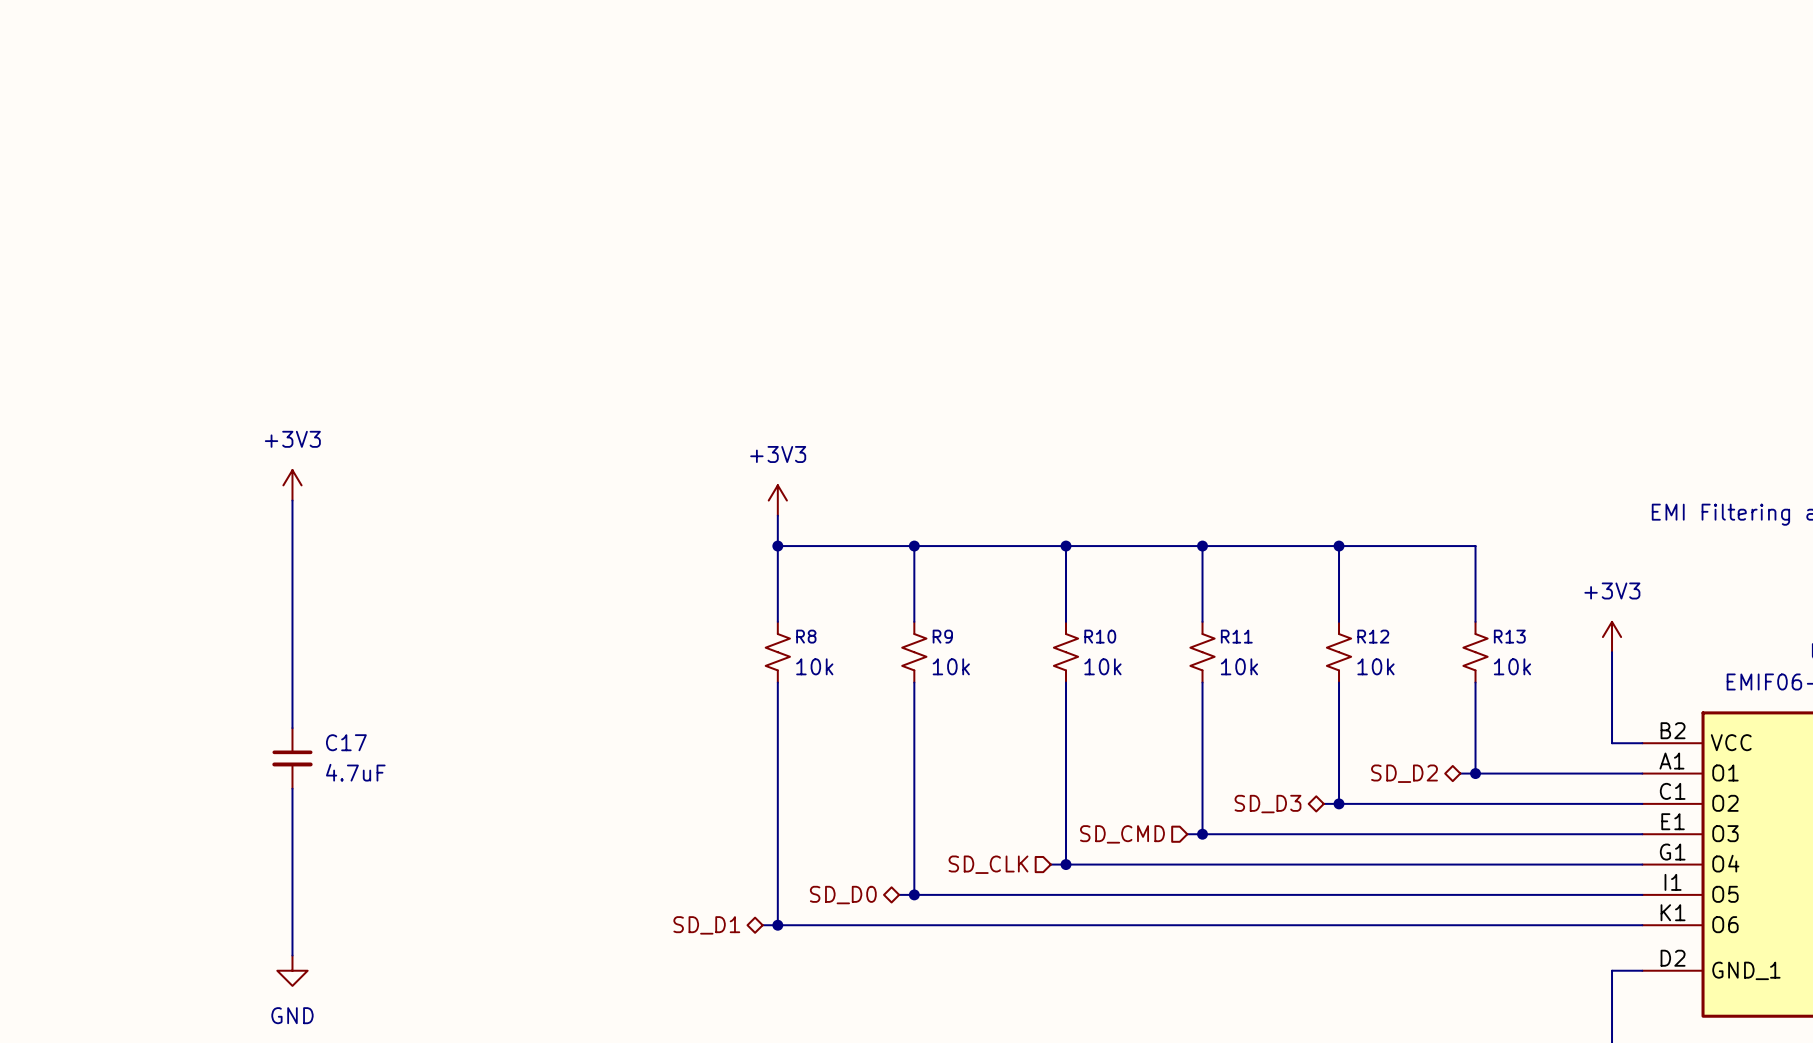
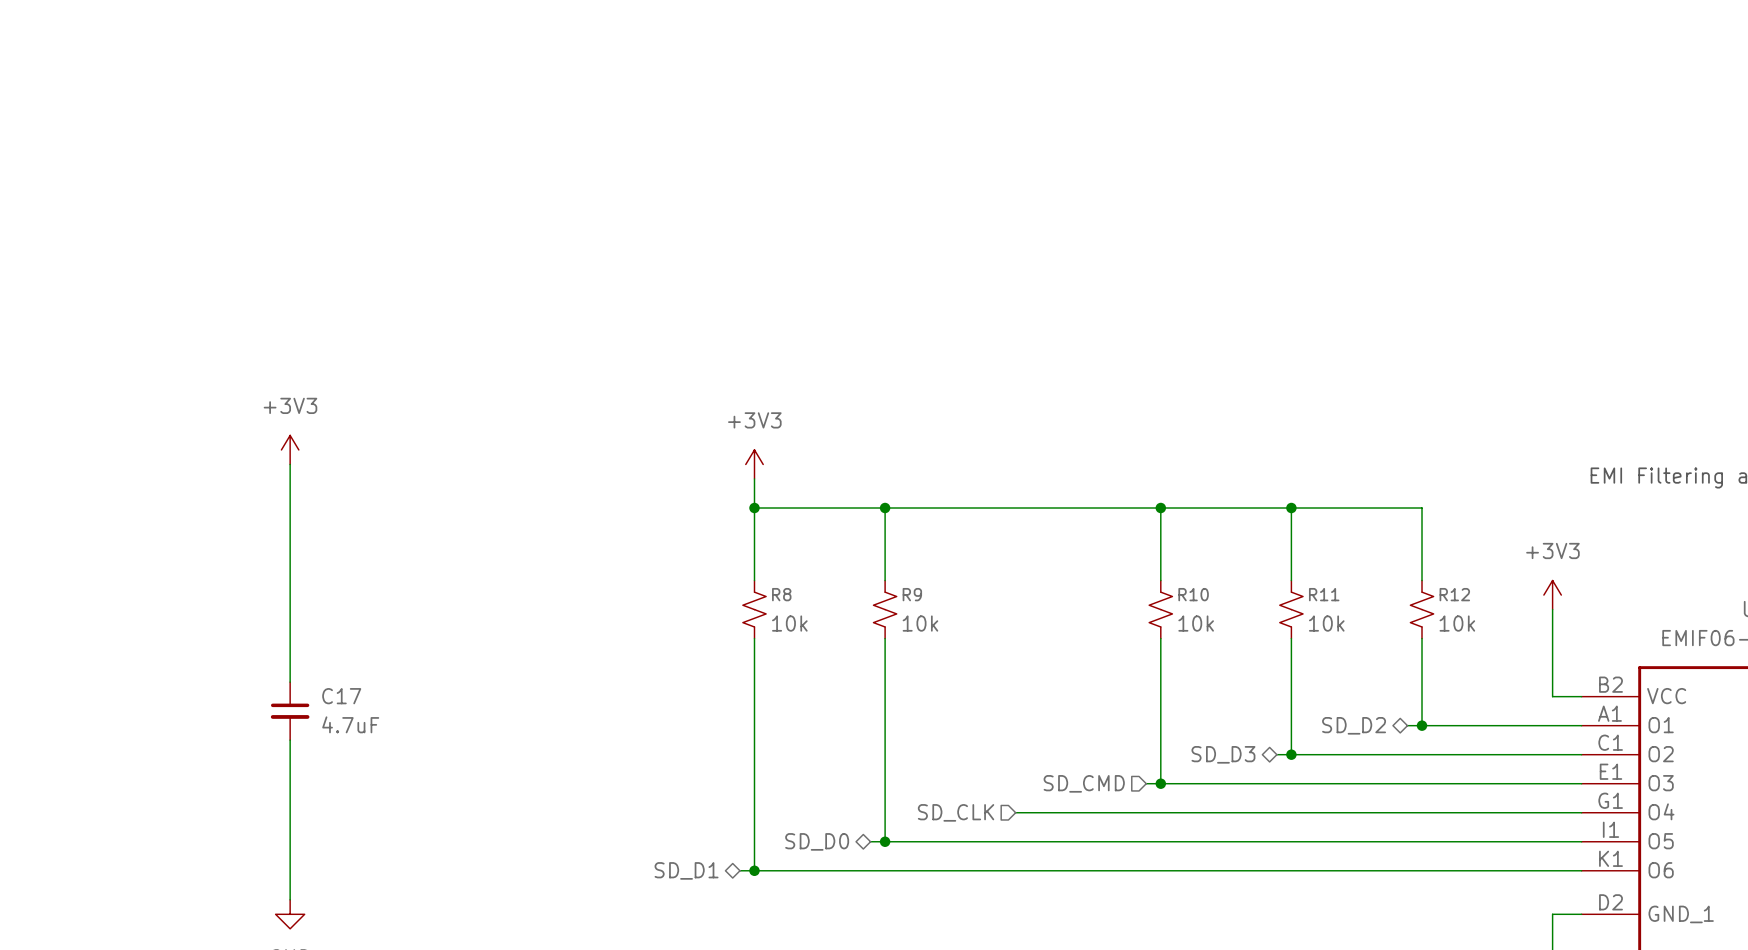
wire: (1066, 546) (1066, 621) -> none
junction: (1066, 546) -> none
R11 name: R11 (1236, 636) -> R10 (1193, 594)
R12 name: R12 (1373, 636) -> R11 (1324, 594)
R13 name: R13 (1509, 636) -> R12 (1454, 594)
R10: 10k (1066, 652) -> none
wire: (1066, 682) (1066, 864) -> none
junction: (1066, 864) -> none

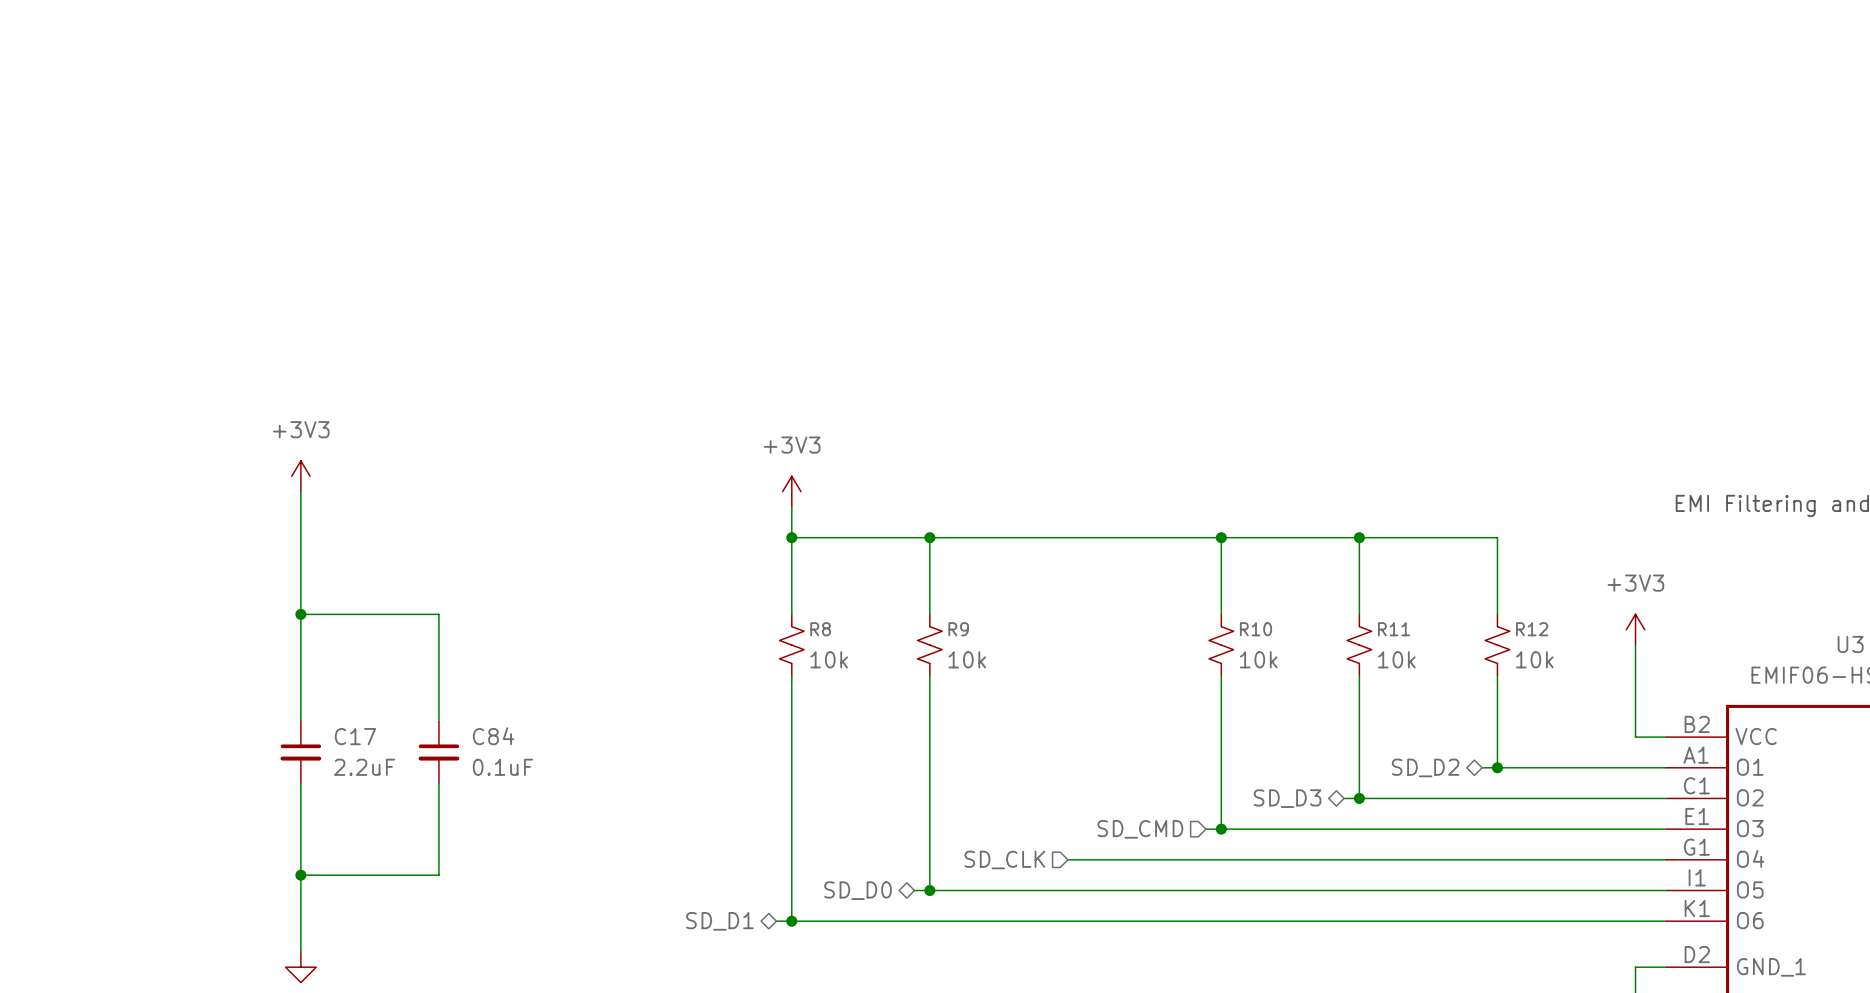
wire: none -> (300, 614) (438, 614) (438, 721)
junction: none -> (300, 614)
C84: none -> 0.1uF (438, 752)
C17 value: 4.7uF (350, 724) -> 2.2uF (364, 767)
wire: none -> (438, 783) (438, 875) (300, 875)
junction: none -> (300, 875)

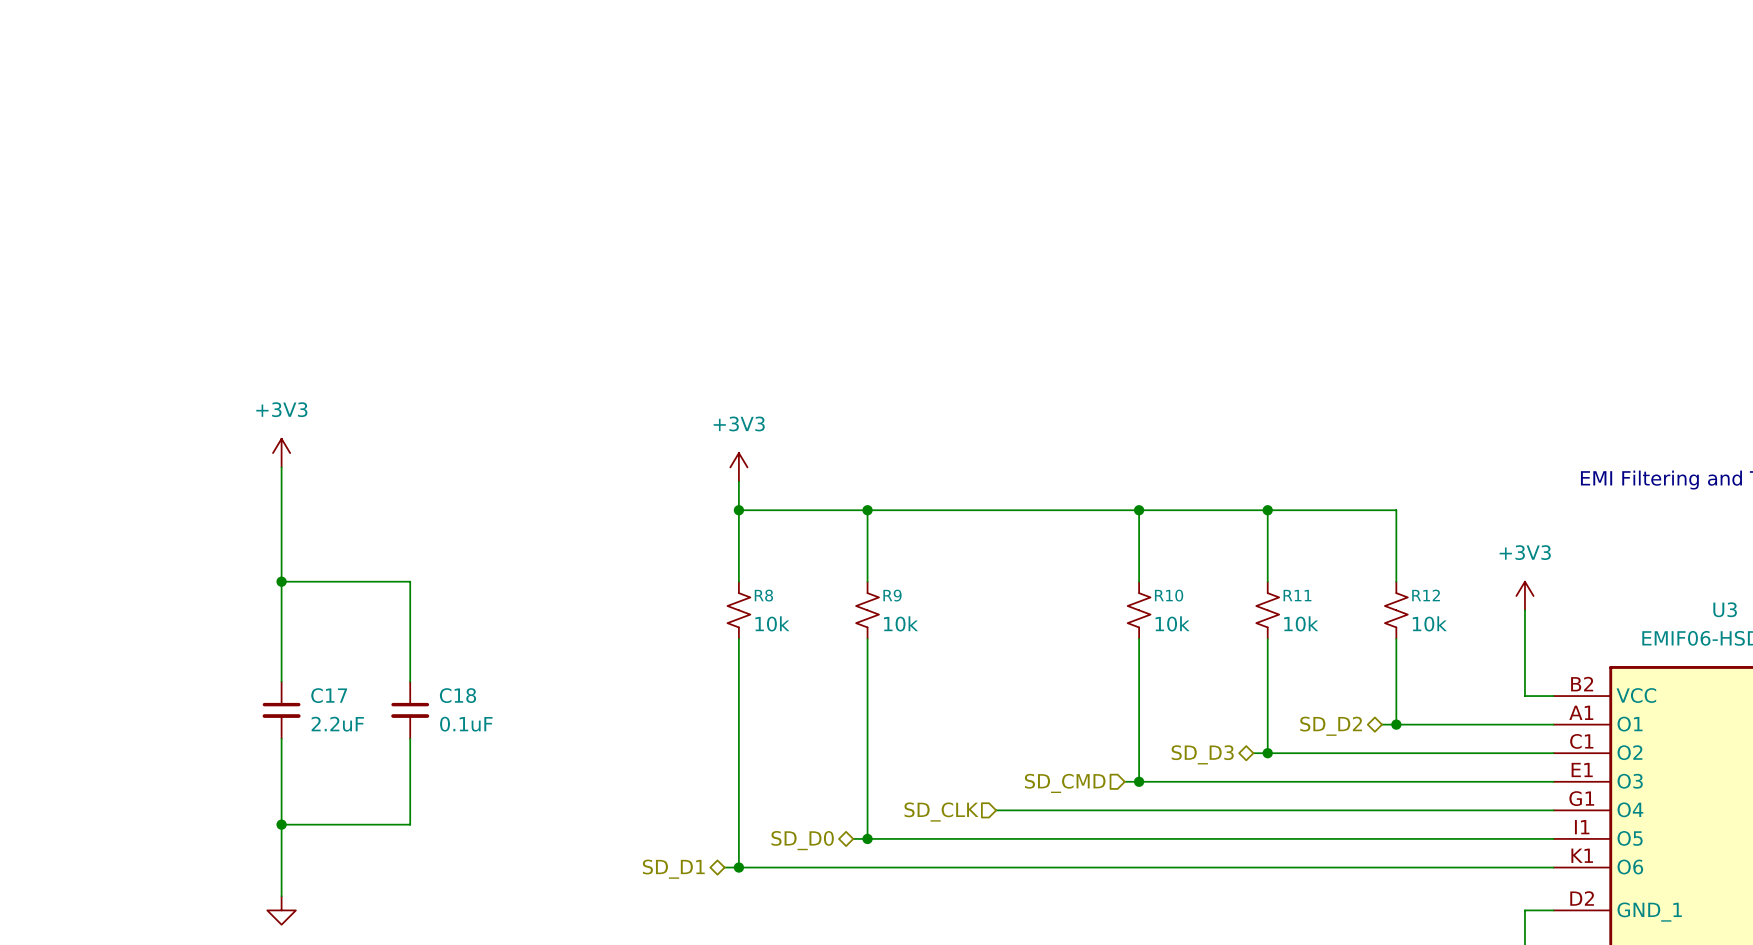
C84 name: C84 (493, 736) -> C18 (457, 695)

